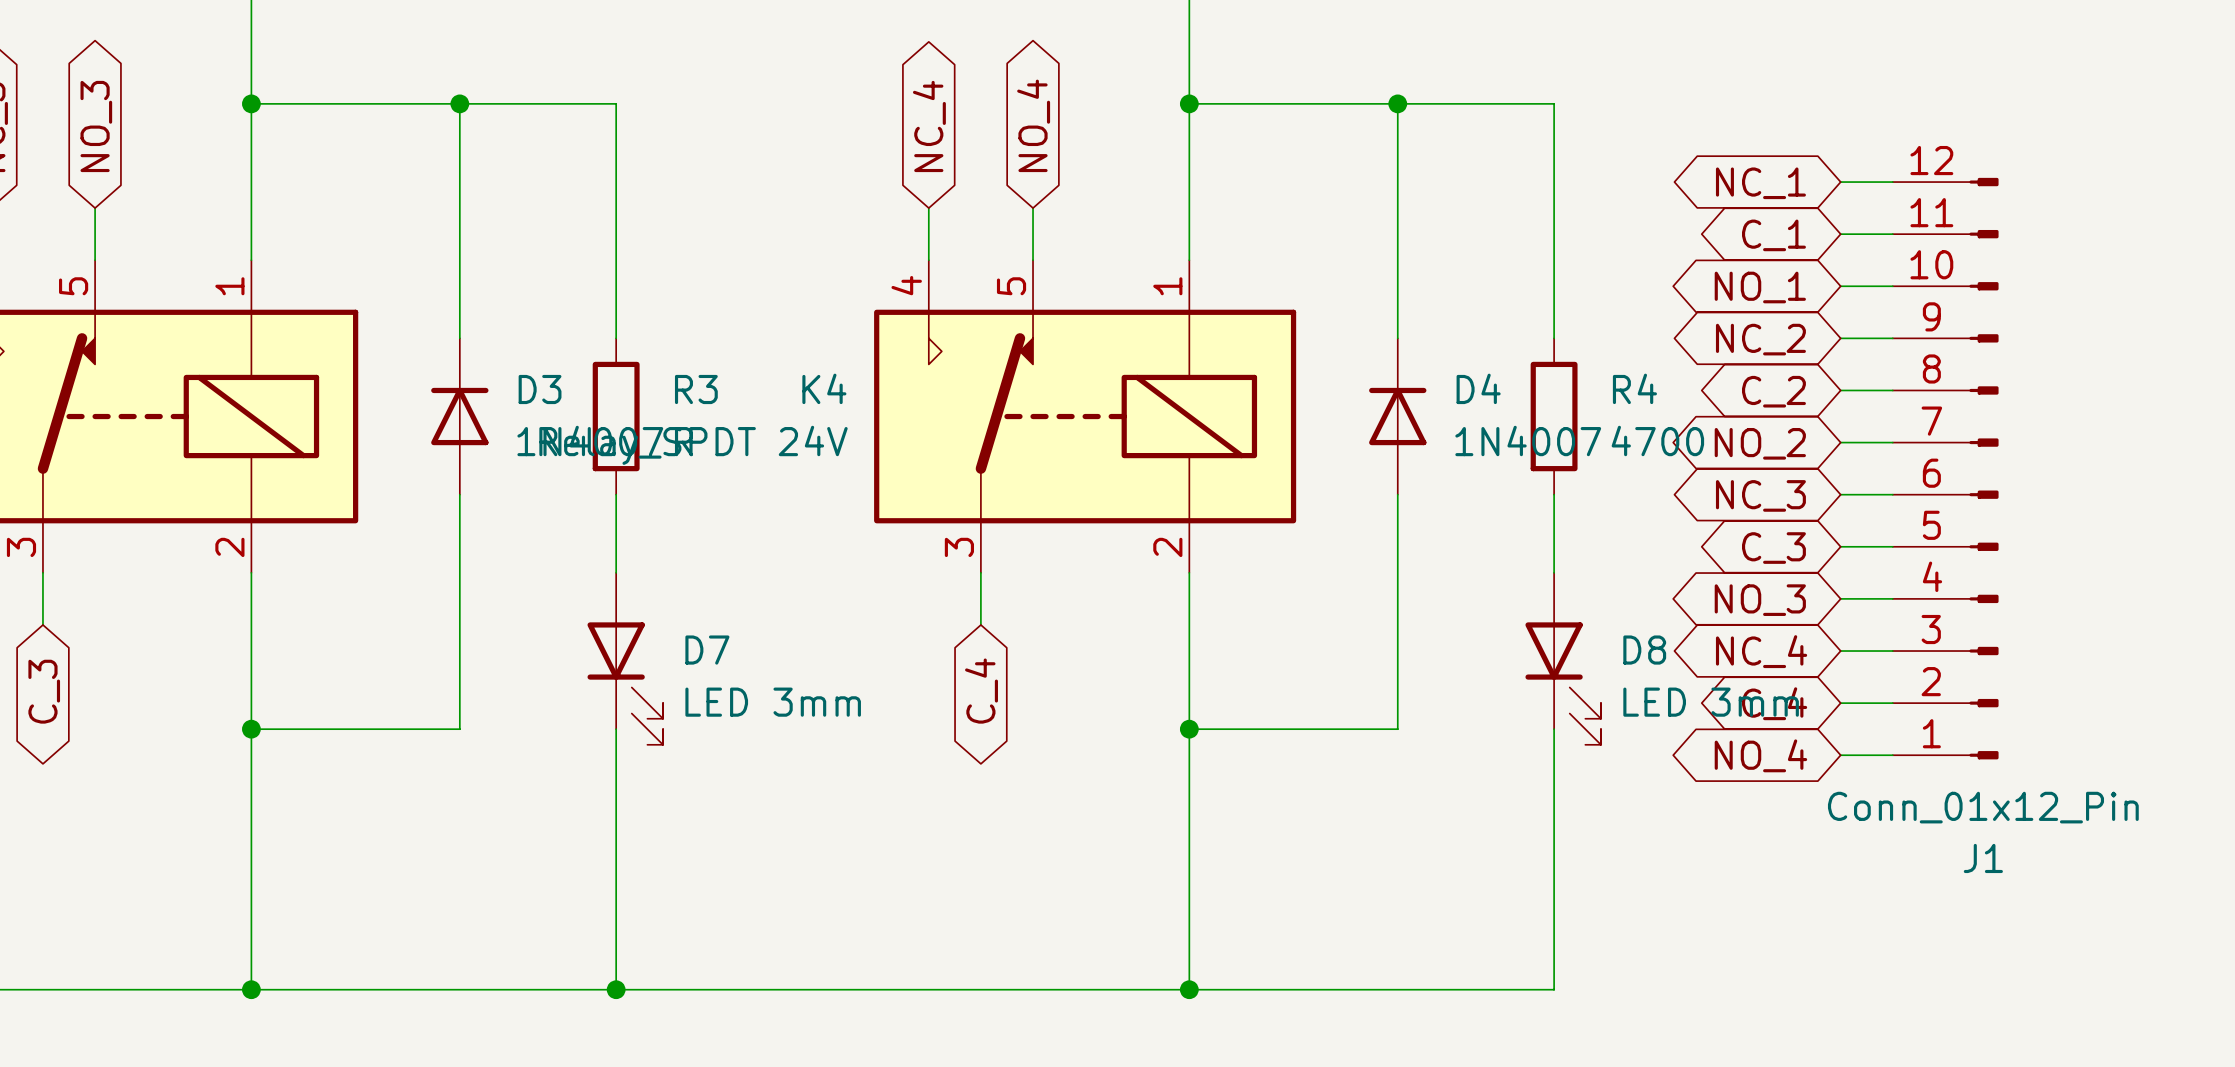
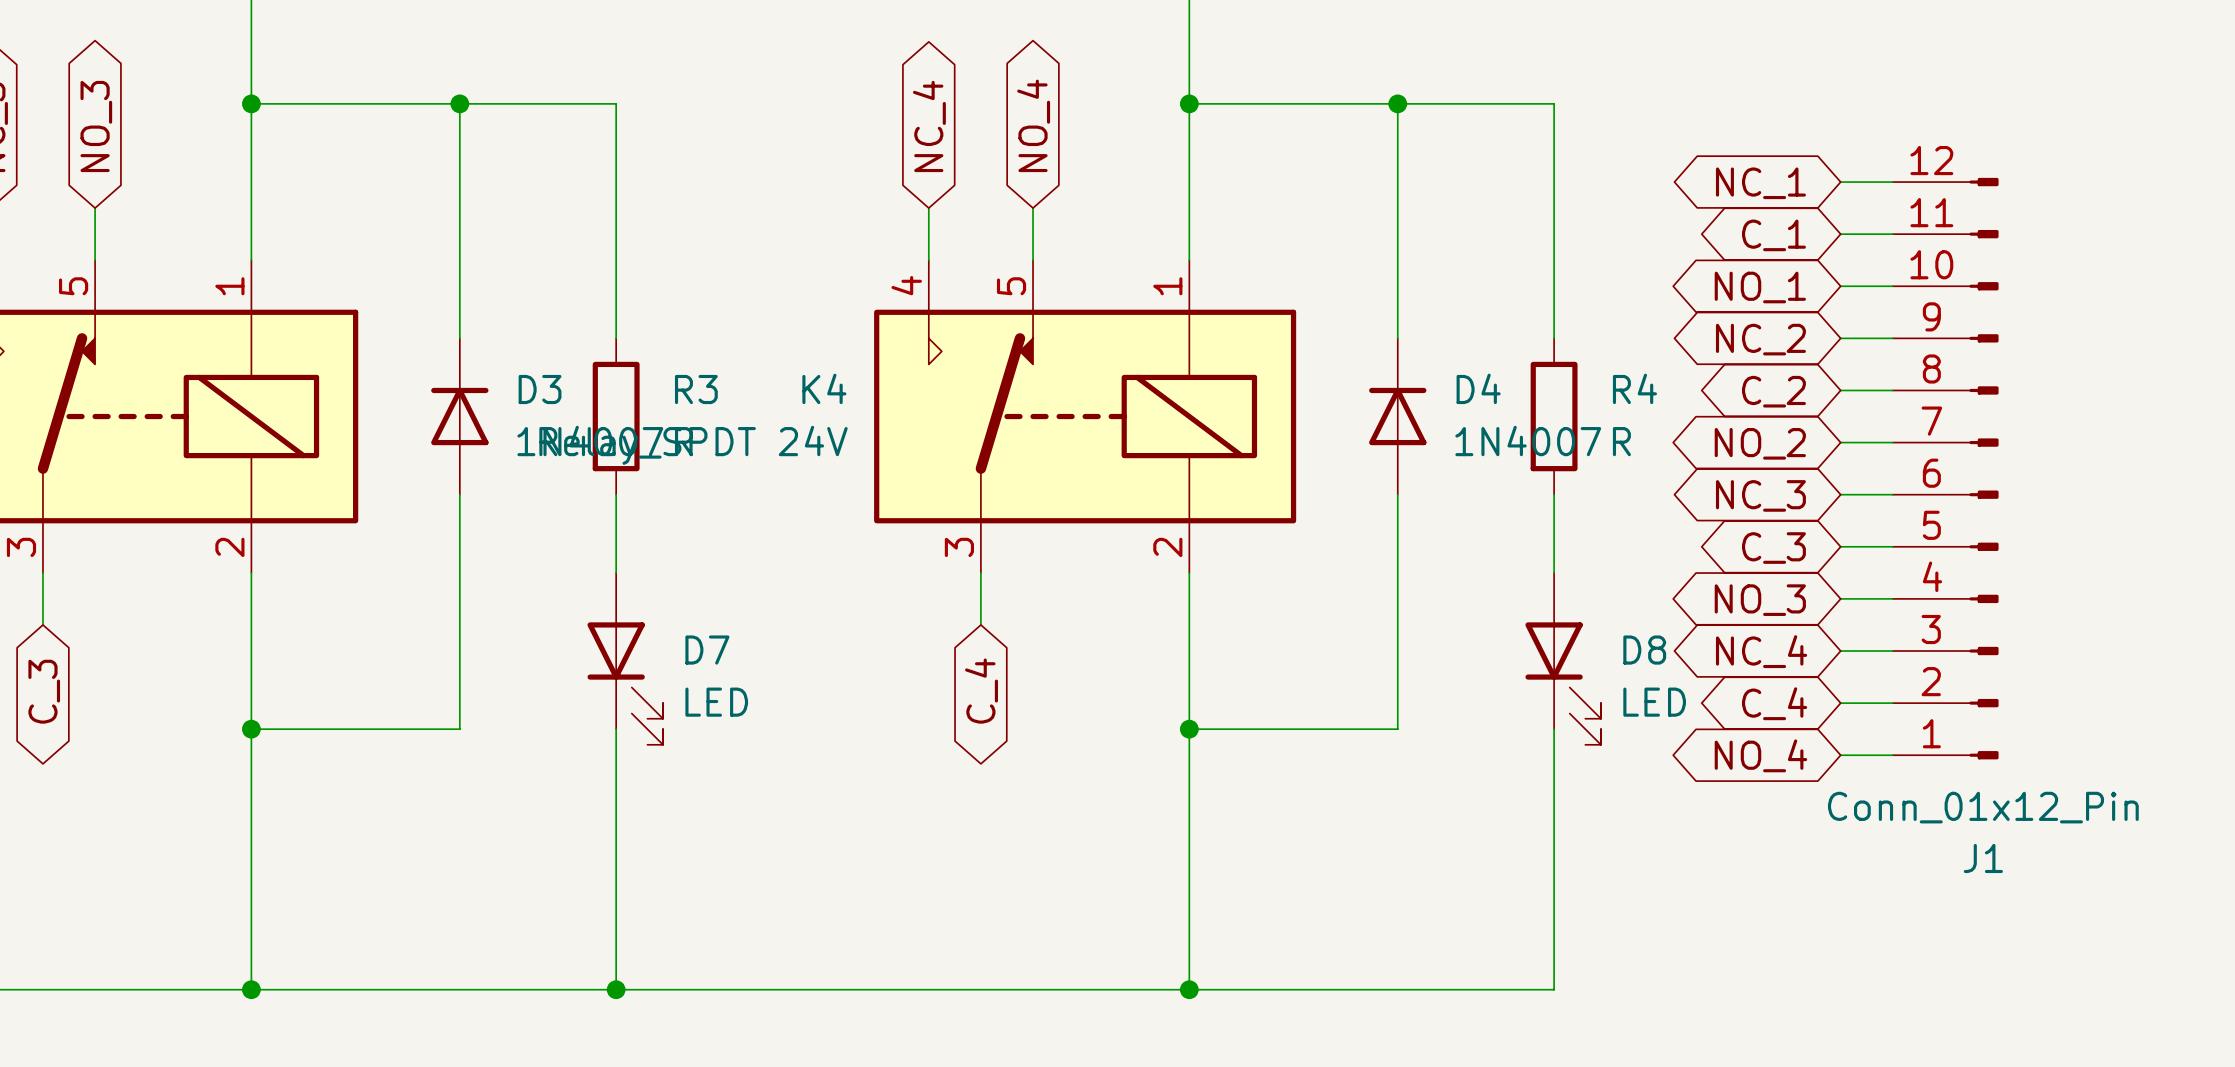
R4 value: 4700 (1657, 440) -> R (1621, 441)
D7 value: LED 3mm (773, 702) -> LED (716, 702)
D8 value: LED 3mm (1711, 702) -> LED (1654, 702)

